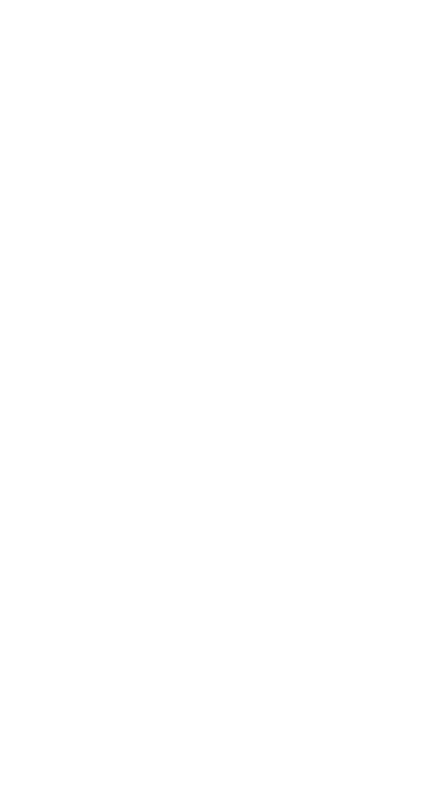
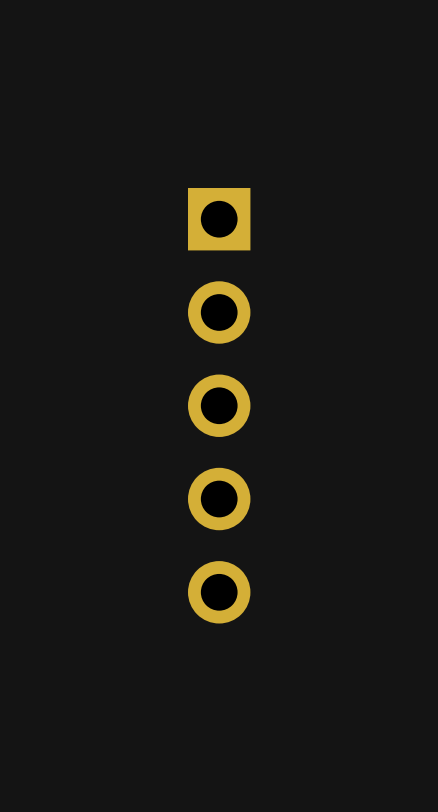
part: none -> (219, 405)

